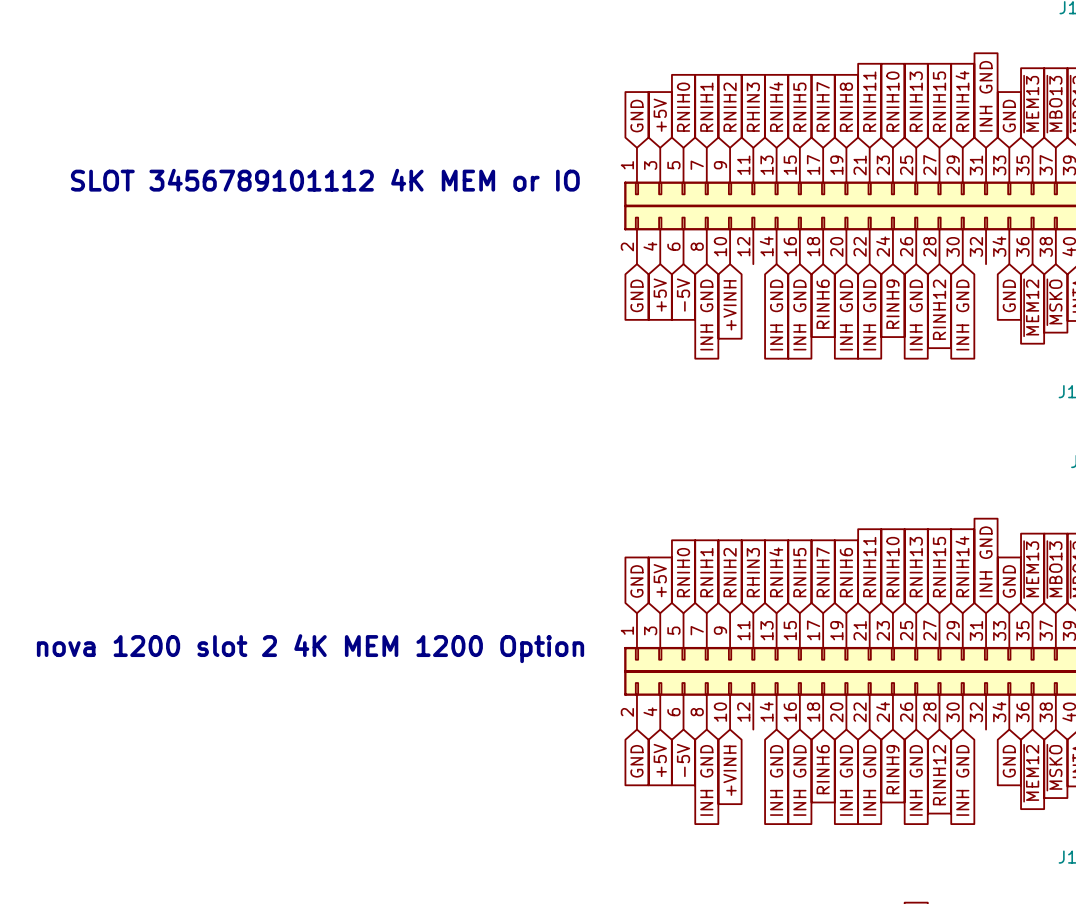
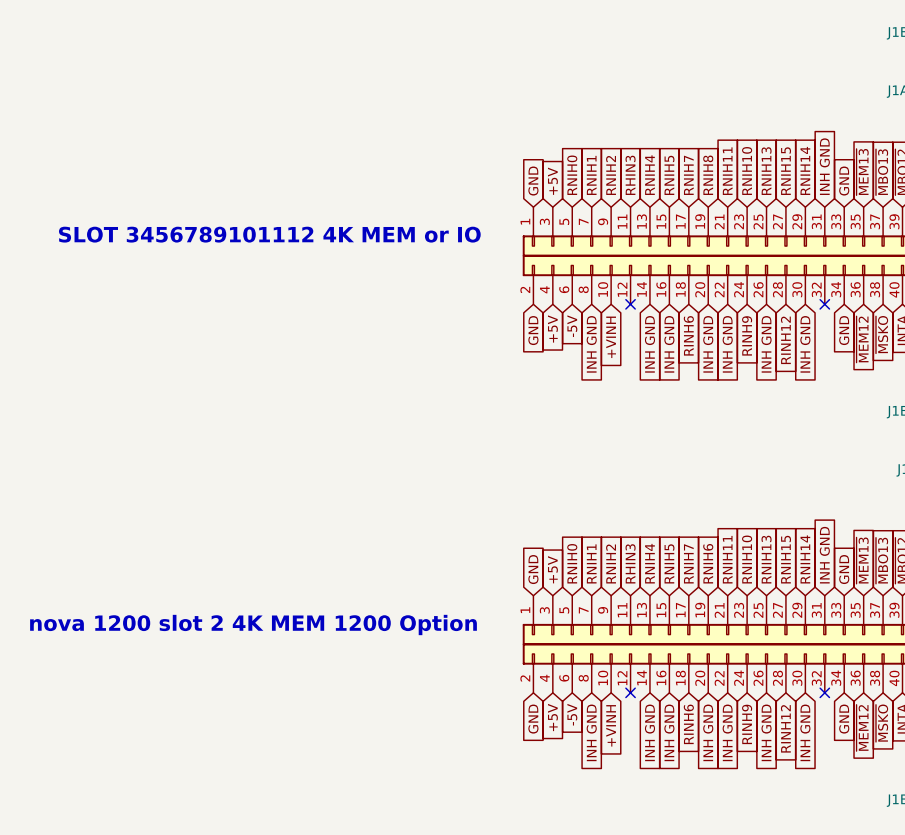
no-connect mark: none -> (630, 304)
no-connect mark: none -> (824, 304)
no-connect mark: none -> (630, 692)
no-connect mark: none -> (824, 692)

